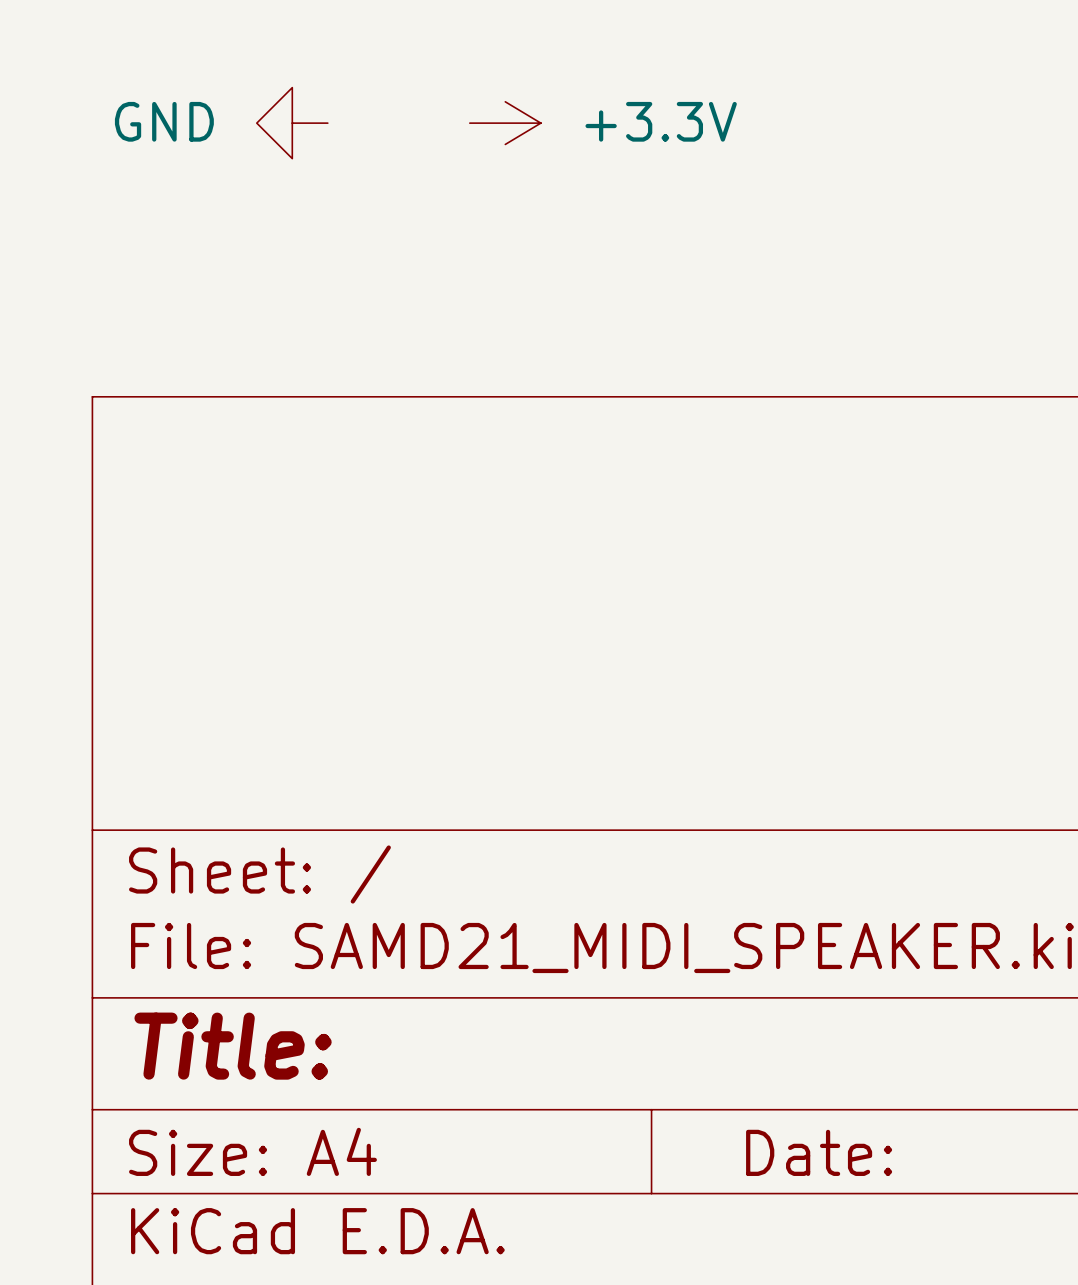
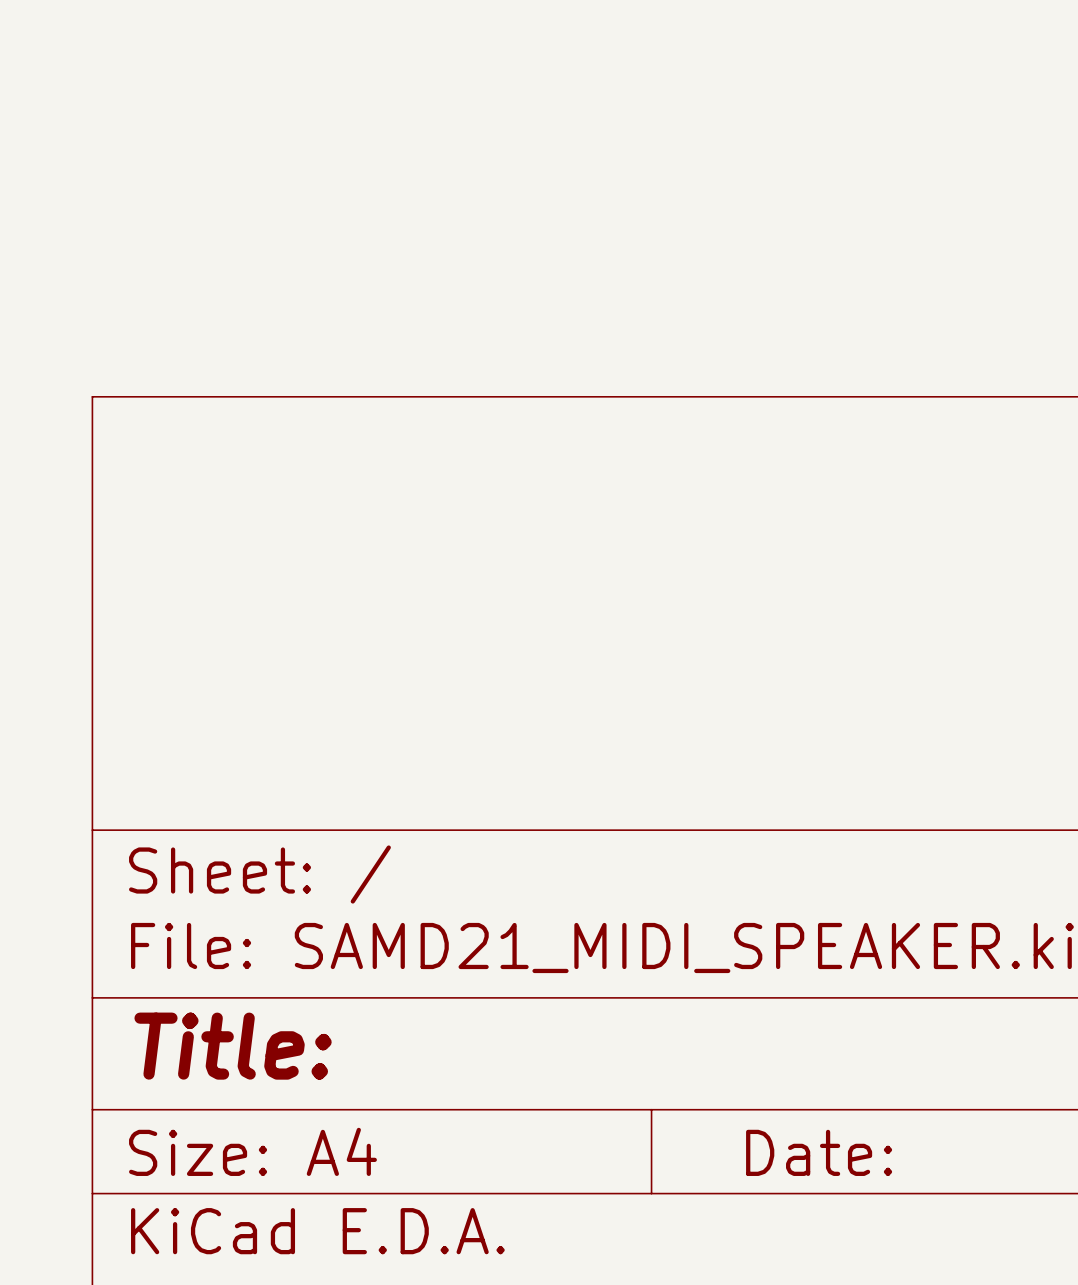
power symbol: GND (292, 123) -> none
power symbol: +3.3V (505, 123) -> none

